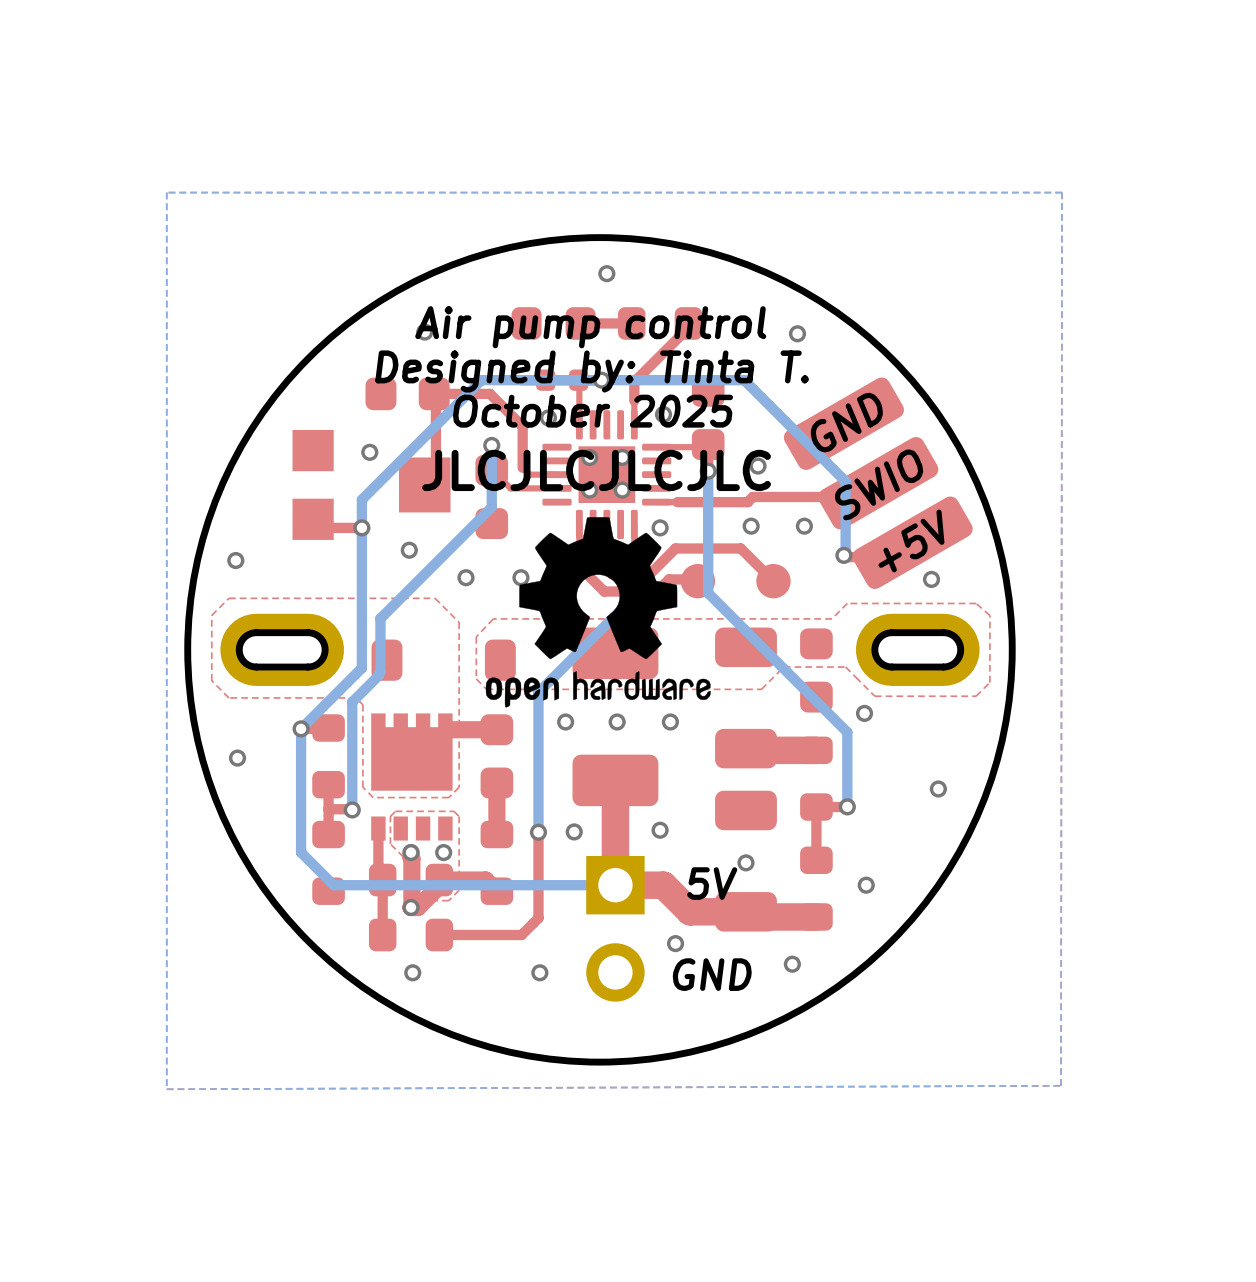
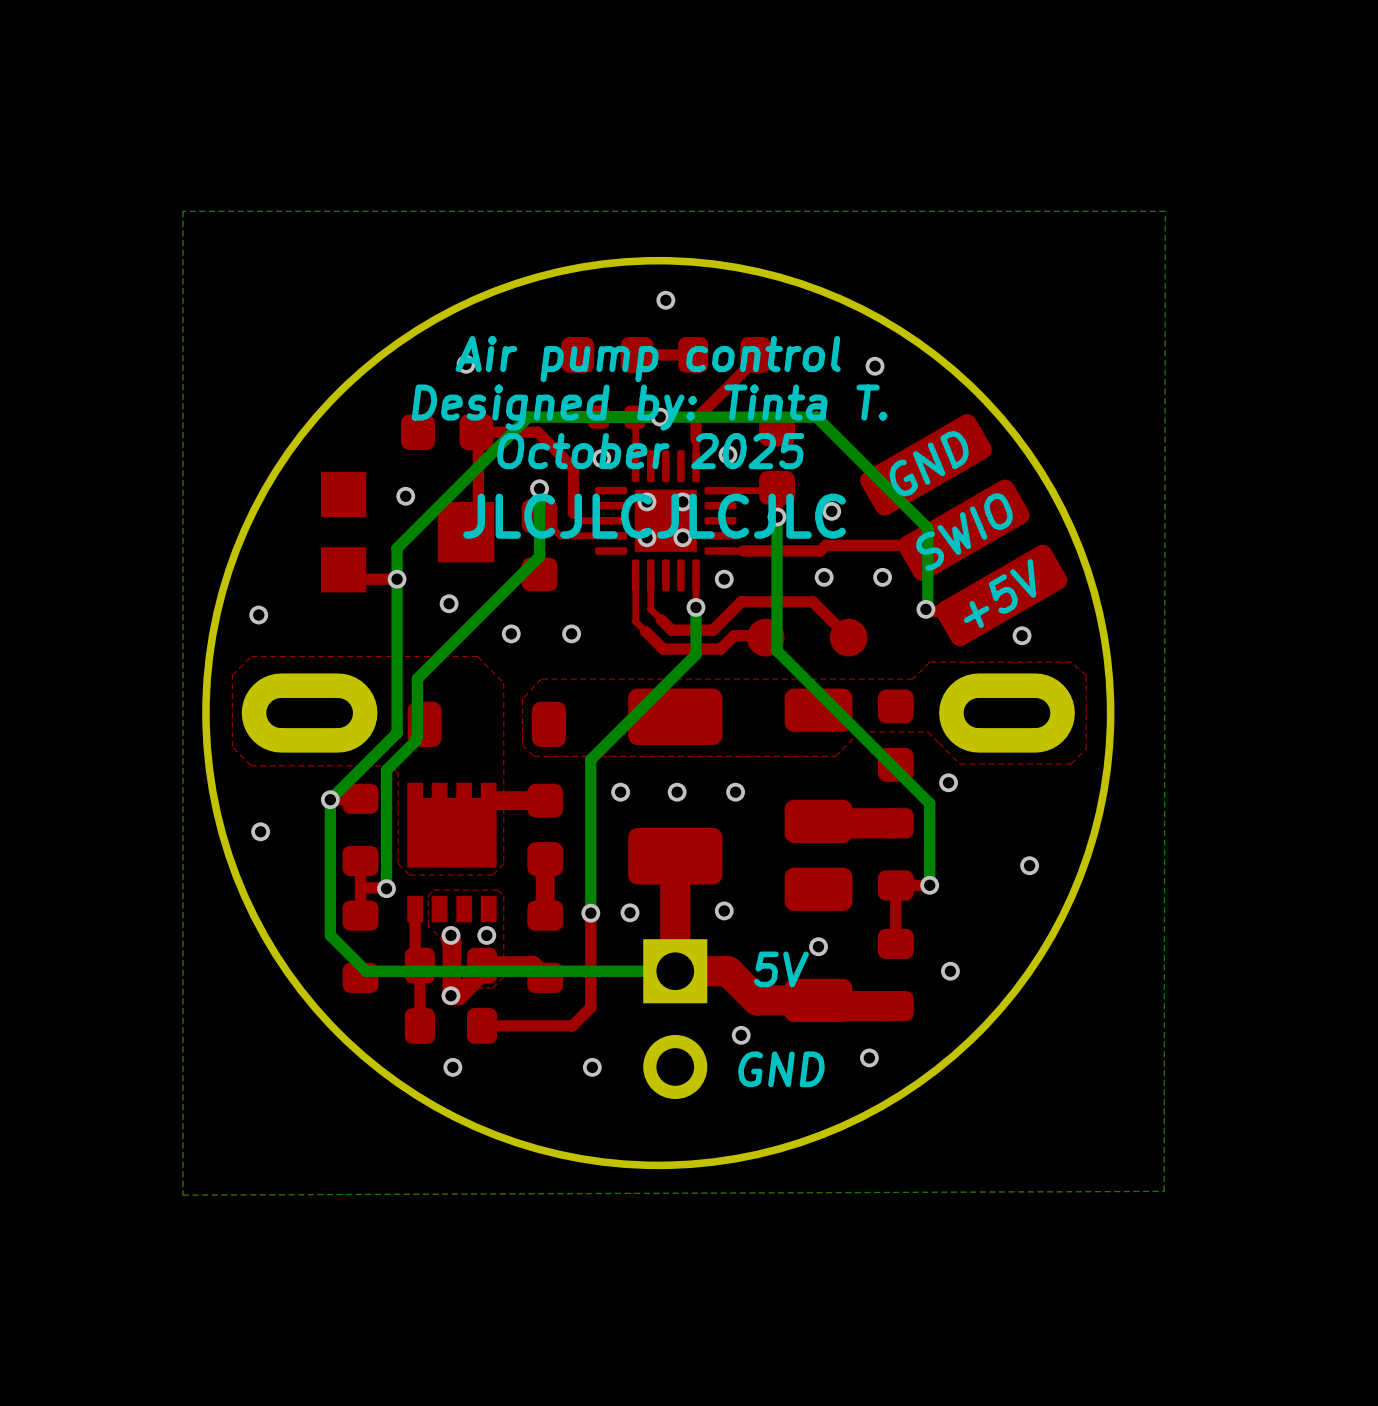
drawing: [485, 517, 711, 708] -> none

